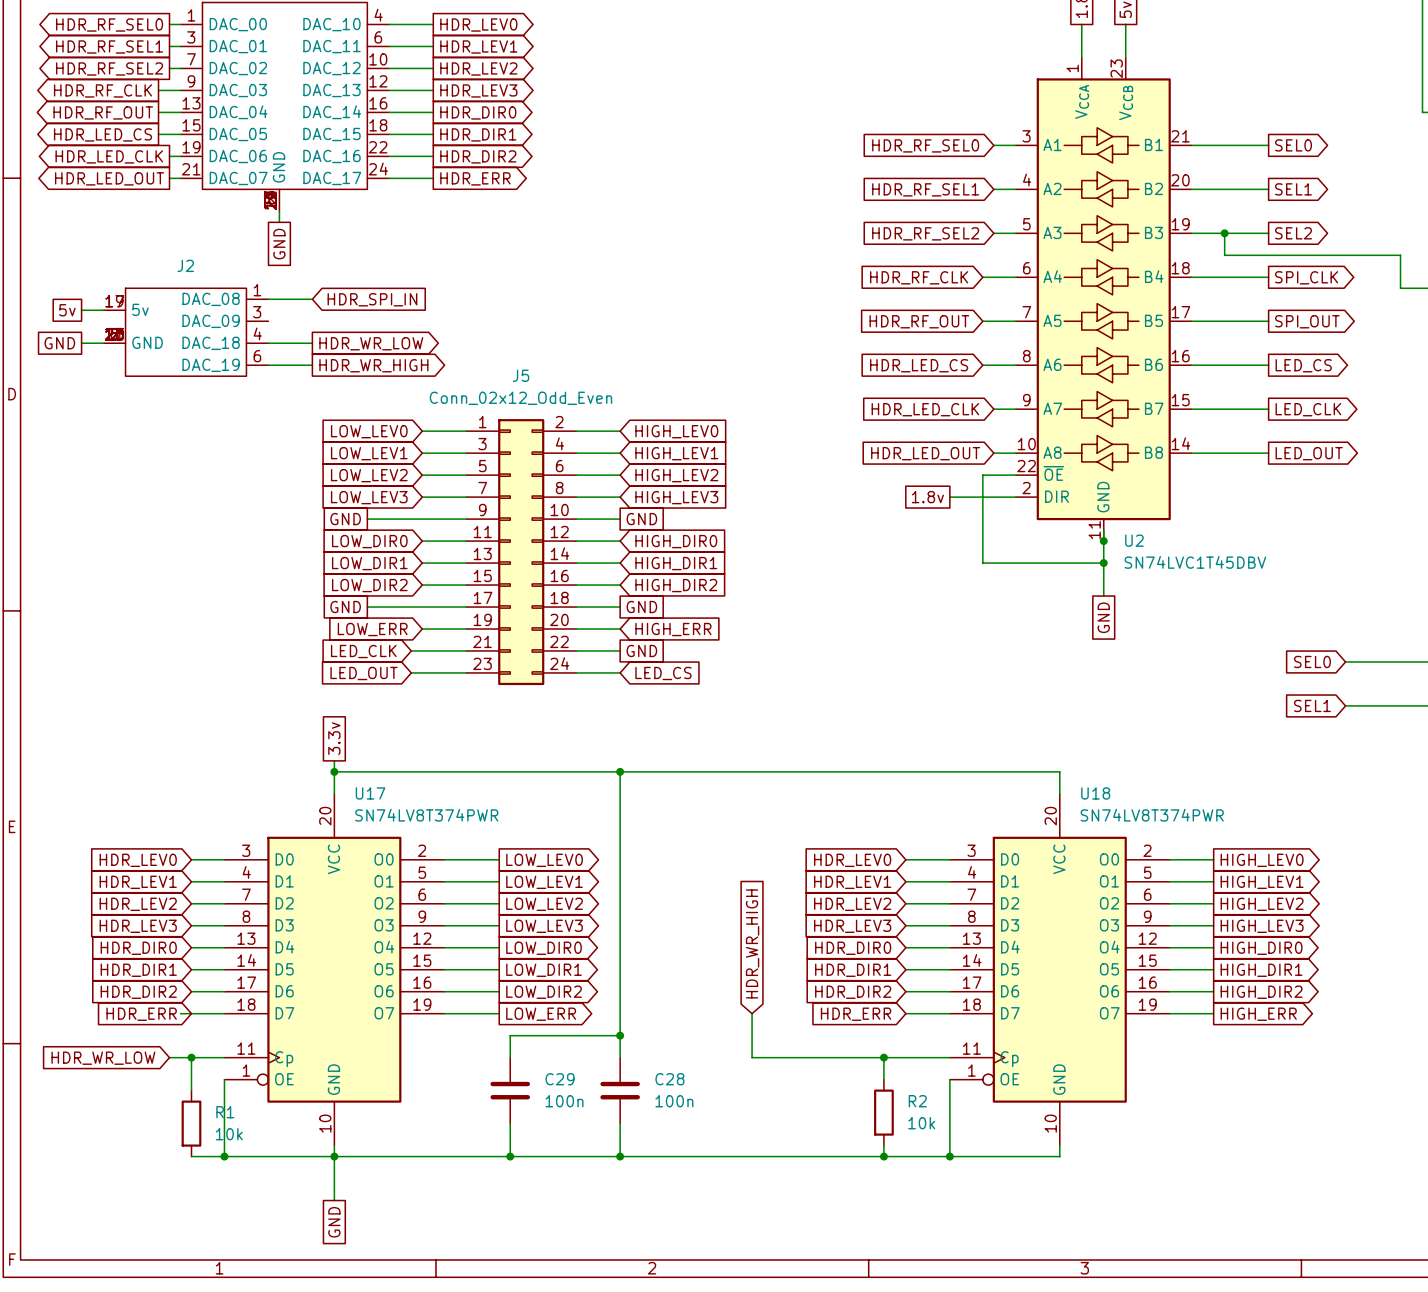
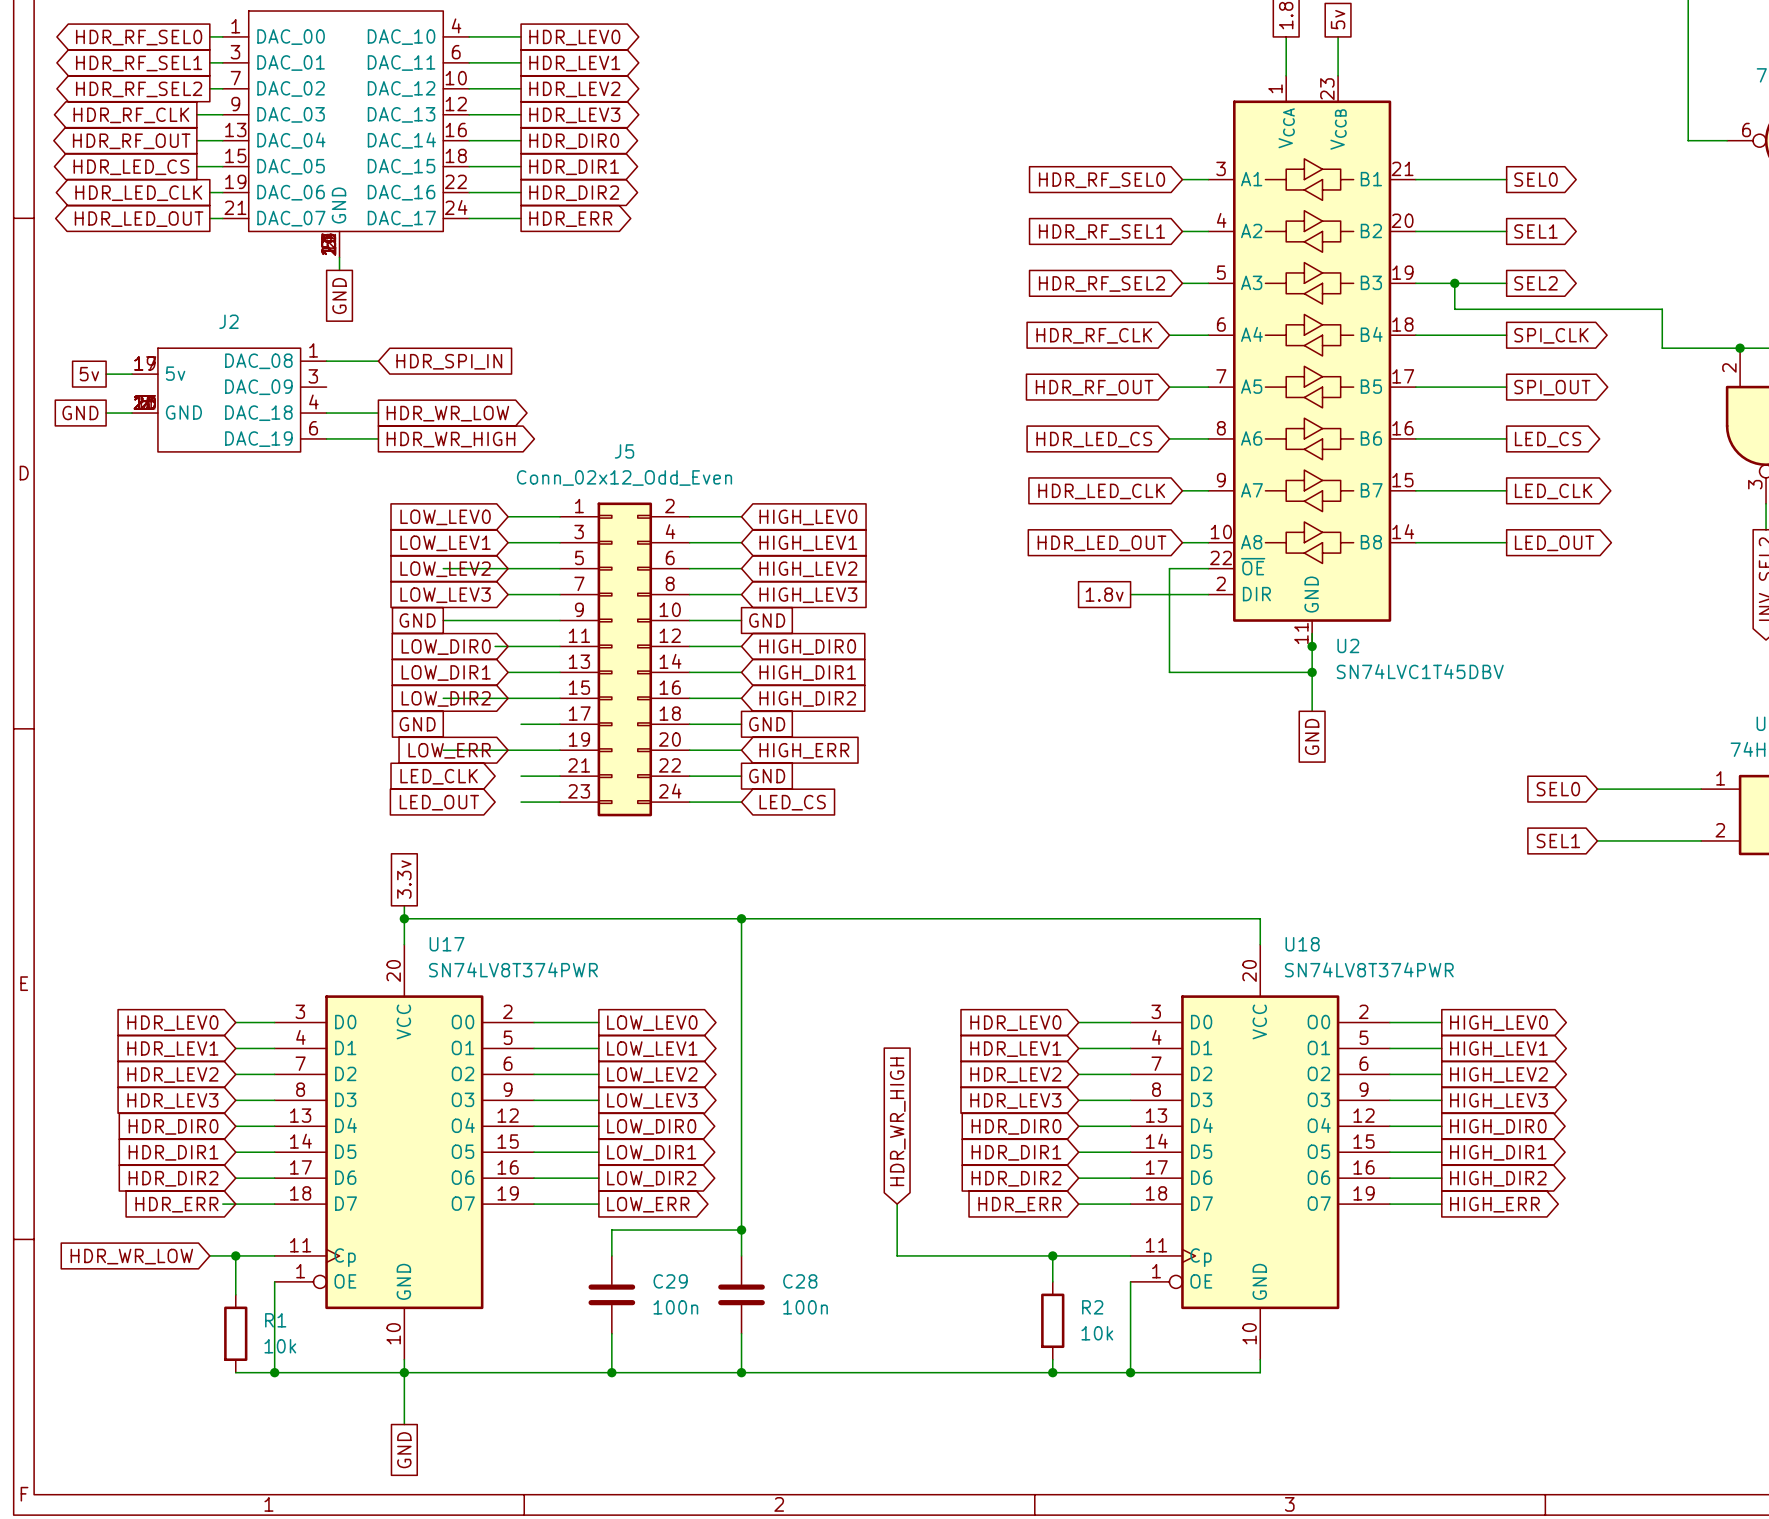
wire: none -> (443, 568) (508, 568)
wire: none -> (495, 646) (508, 646)
wire: none -> (443, 698) (508, 698)
wire: (367, 607) (433, 607) -> none
wire: none -> (443, 750) (508, 750)
wire: (411, 650) (433, 650) -> none
wire: (411, 672) (433, 672) -> none

